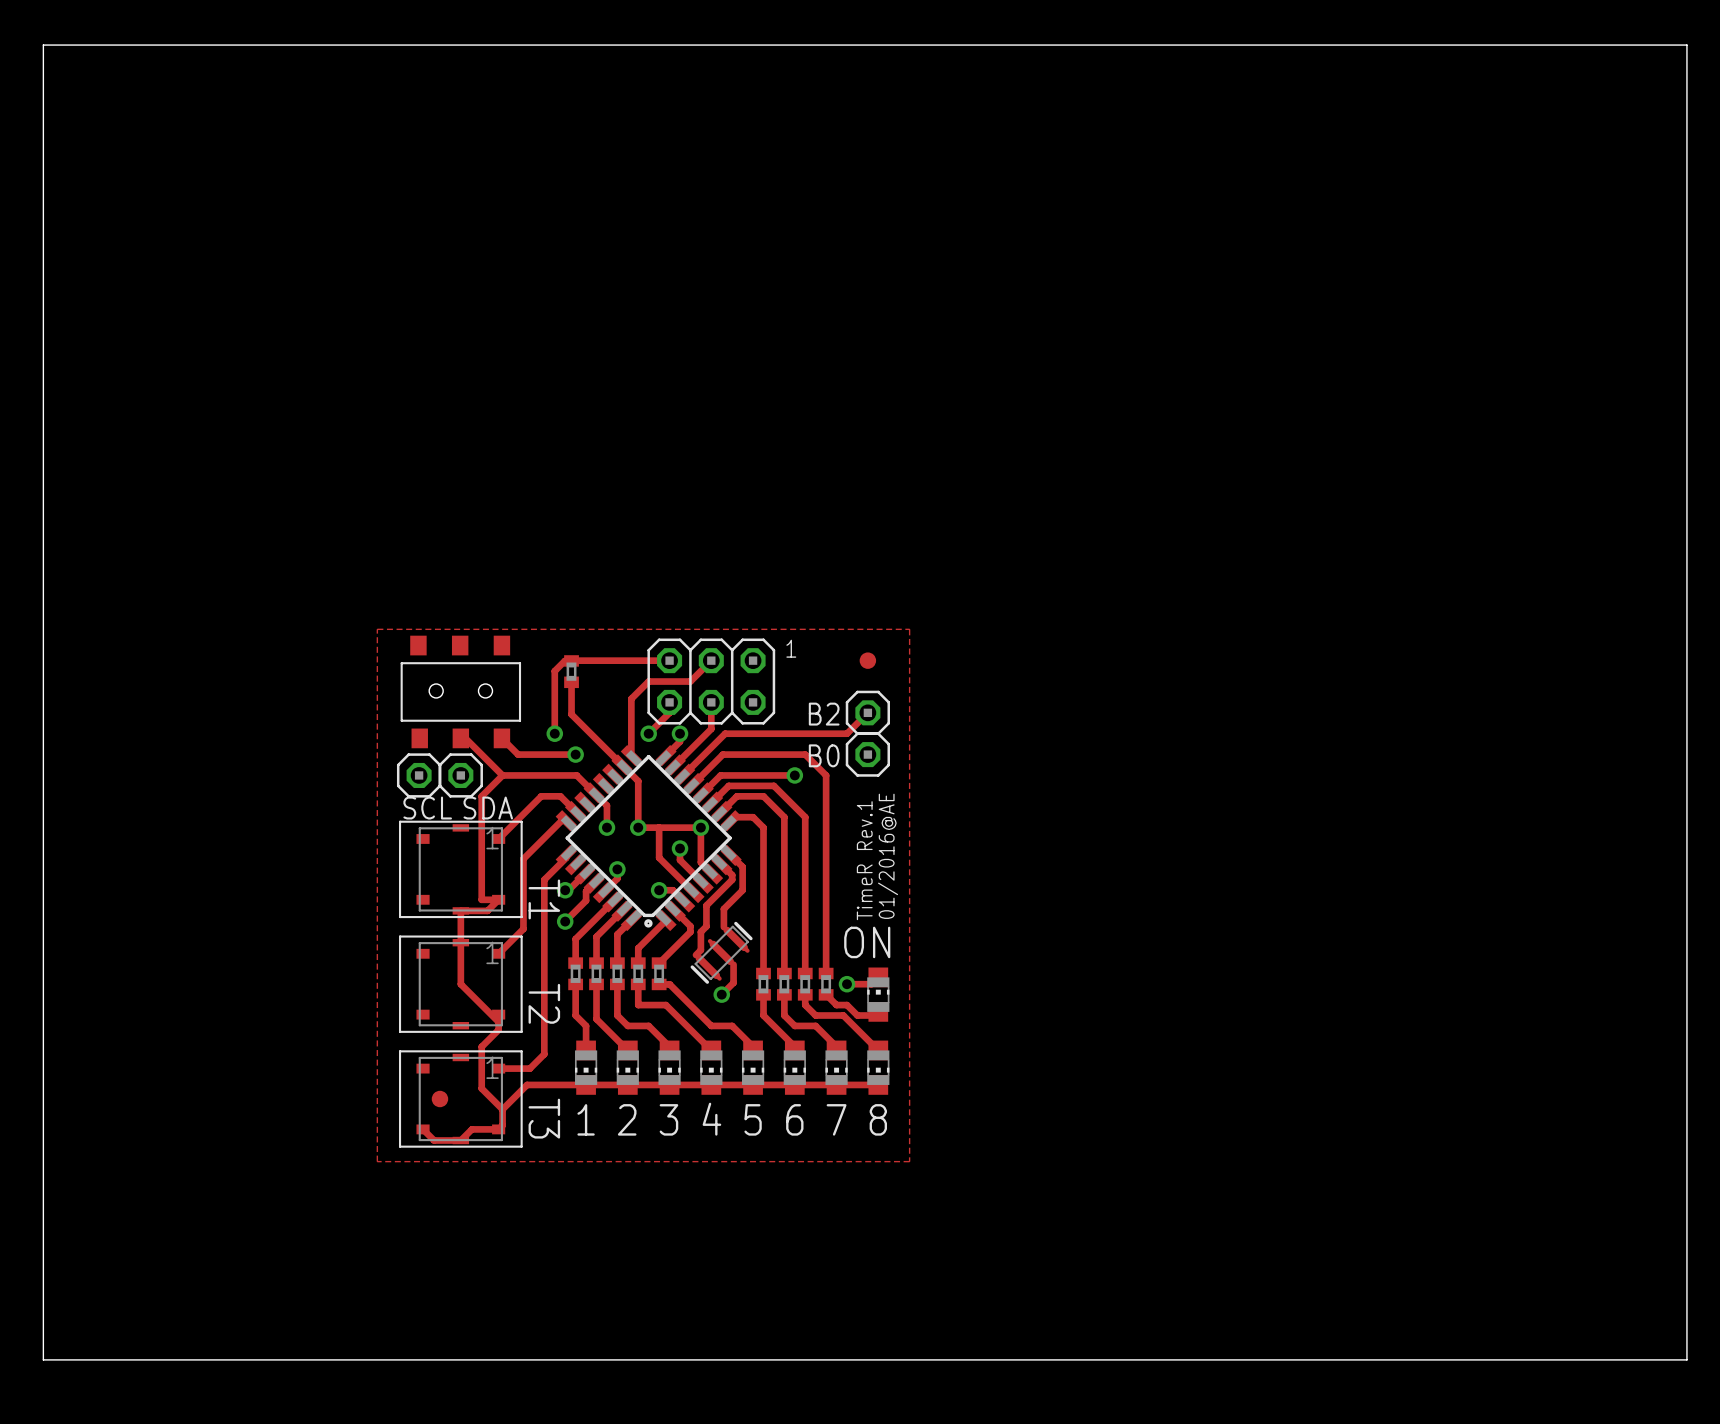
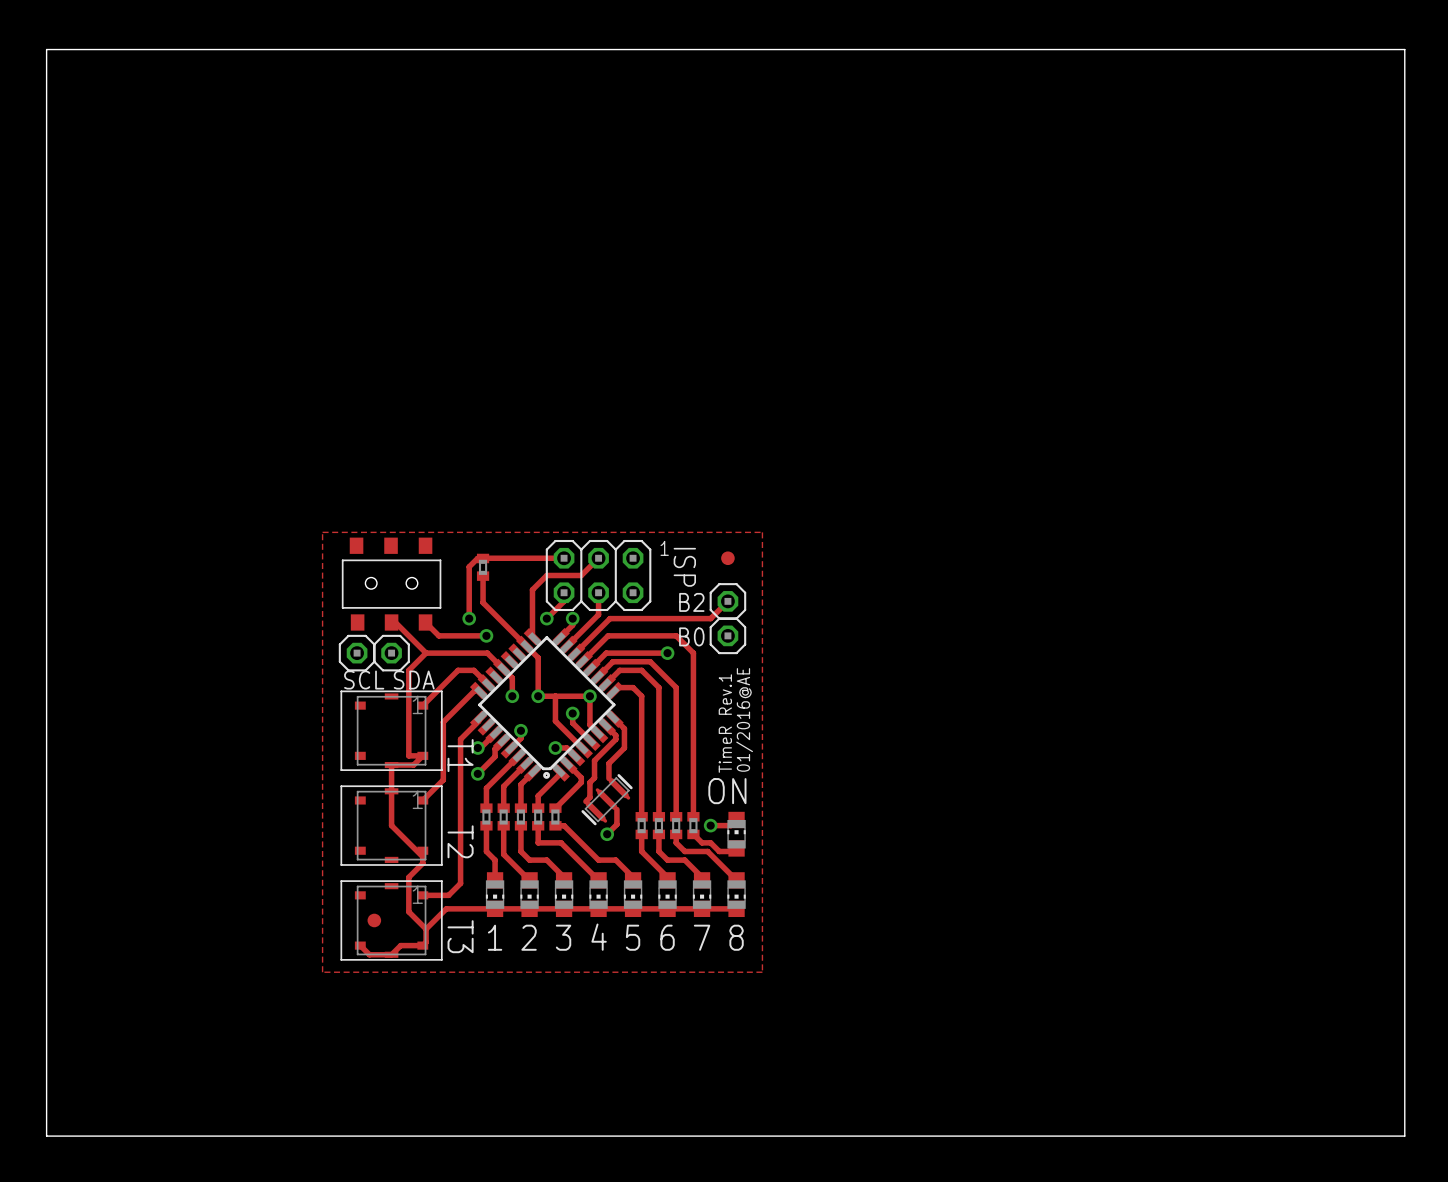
text: none -> ISP (684, 567)

